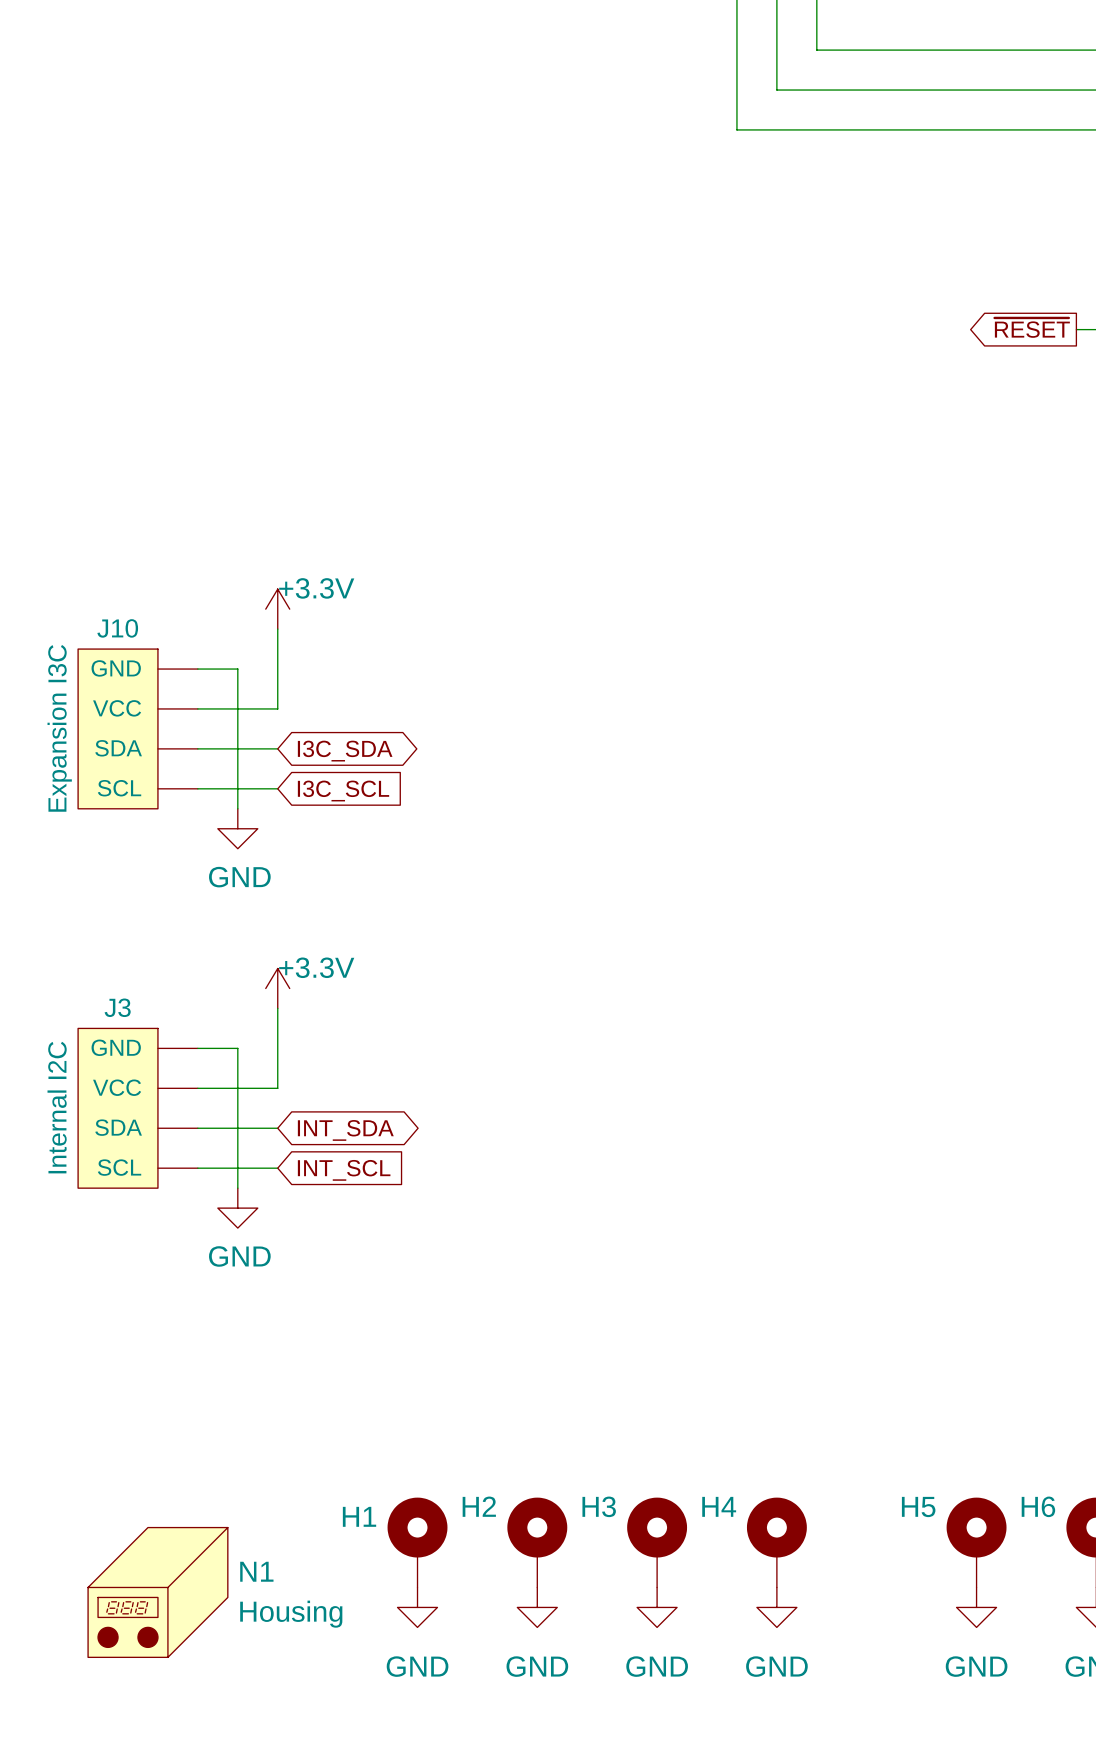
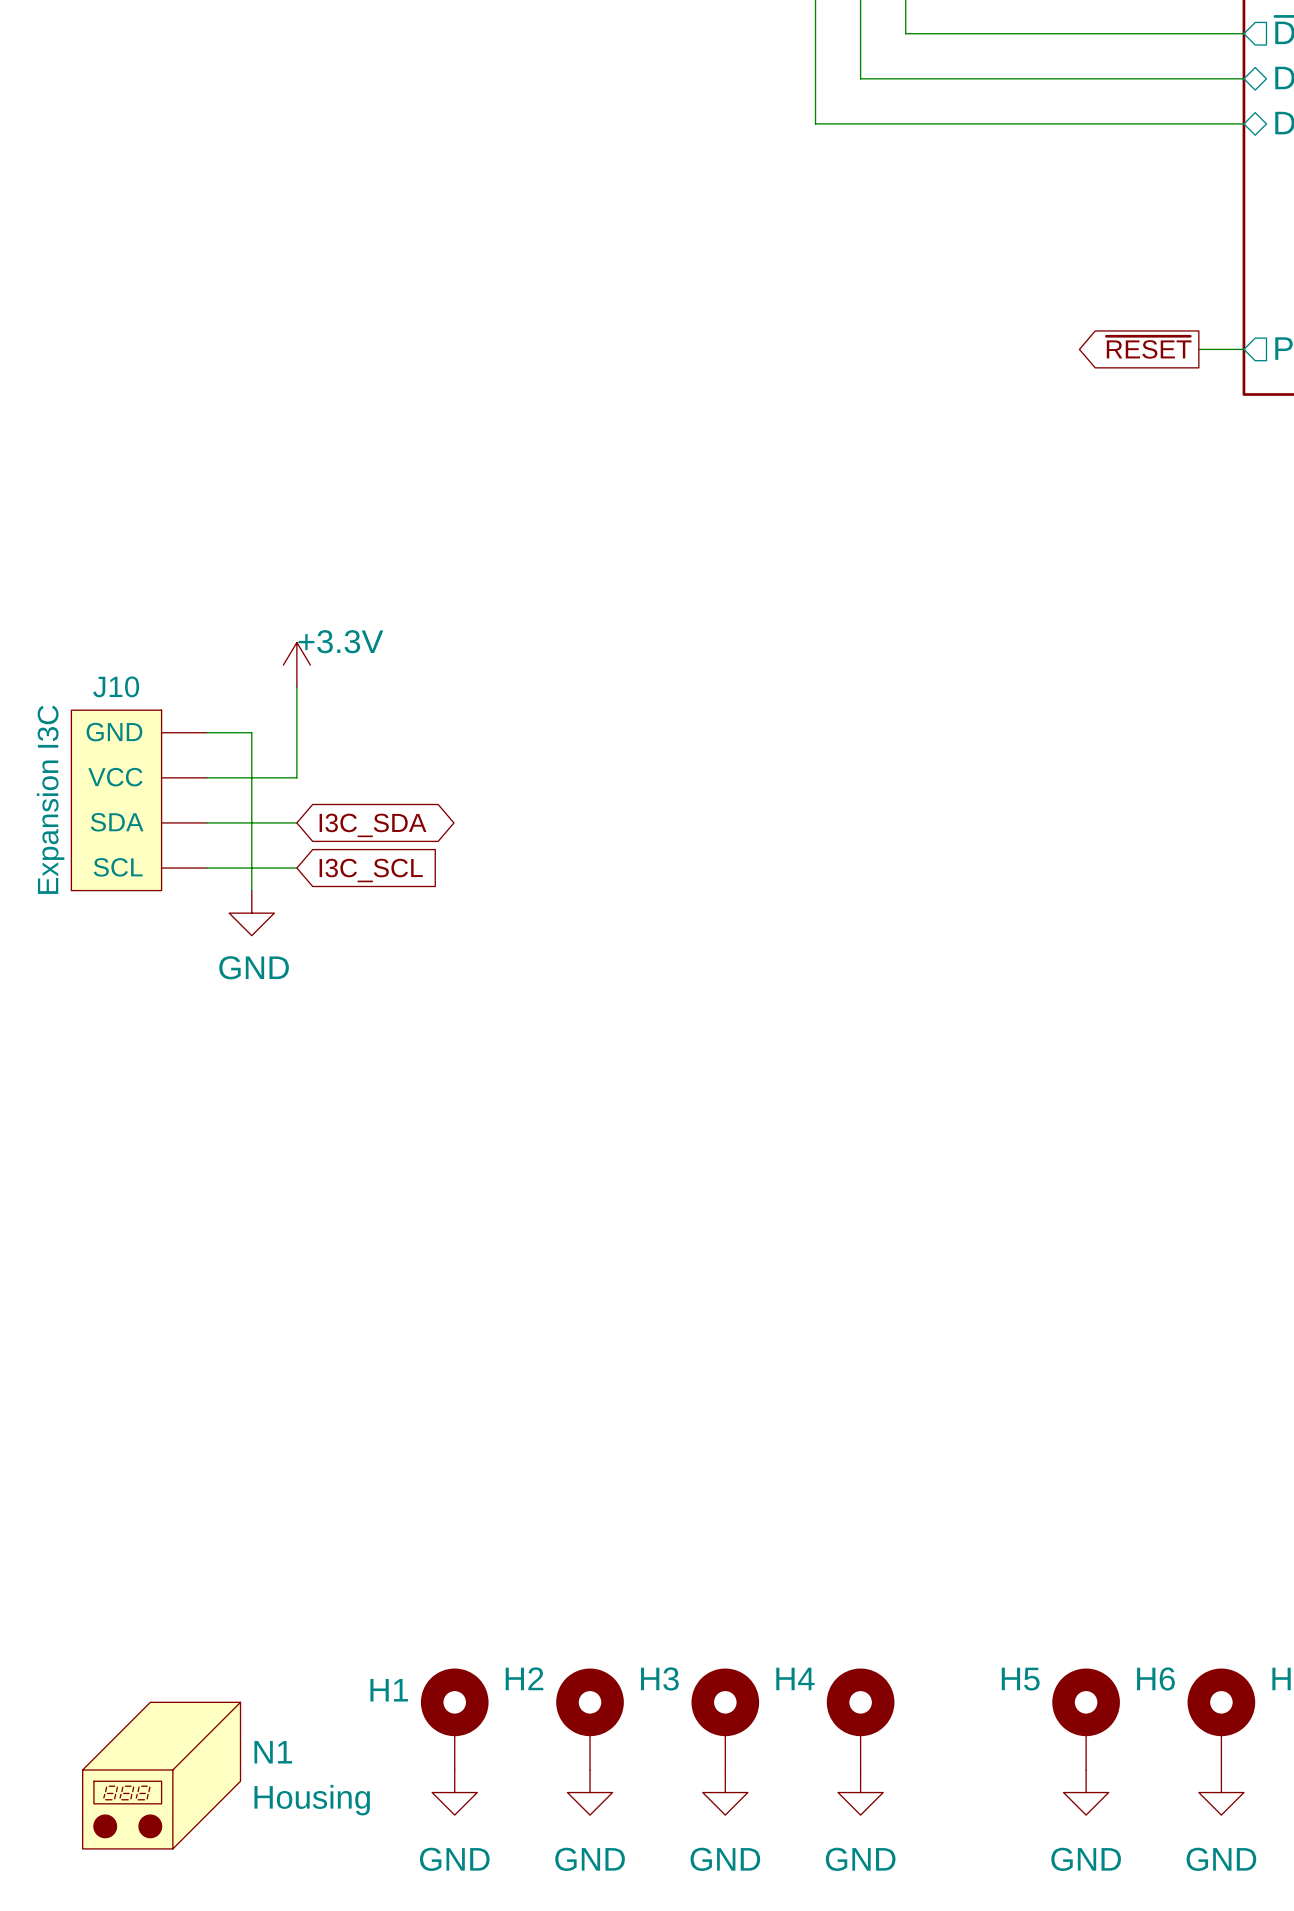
power symbol: +3.3V (277, 988) -> none
wire: (277, 1008) (277, 1088) (197, 1088) -> none
wire: (197, 1048) (237, 1048) (237, 1188) -> none
J3: Internal I2C (137, 1108) -> none
wire: (197, 1128) (277, 1128) -> none
global label: INT_SDA (345, 1130) -> none
wire: (197, 1168) (277, 1168) -> none
global label: INT_SCL (344, 1170) -> none
power symbol: GND (237, 1208) -> none

